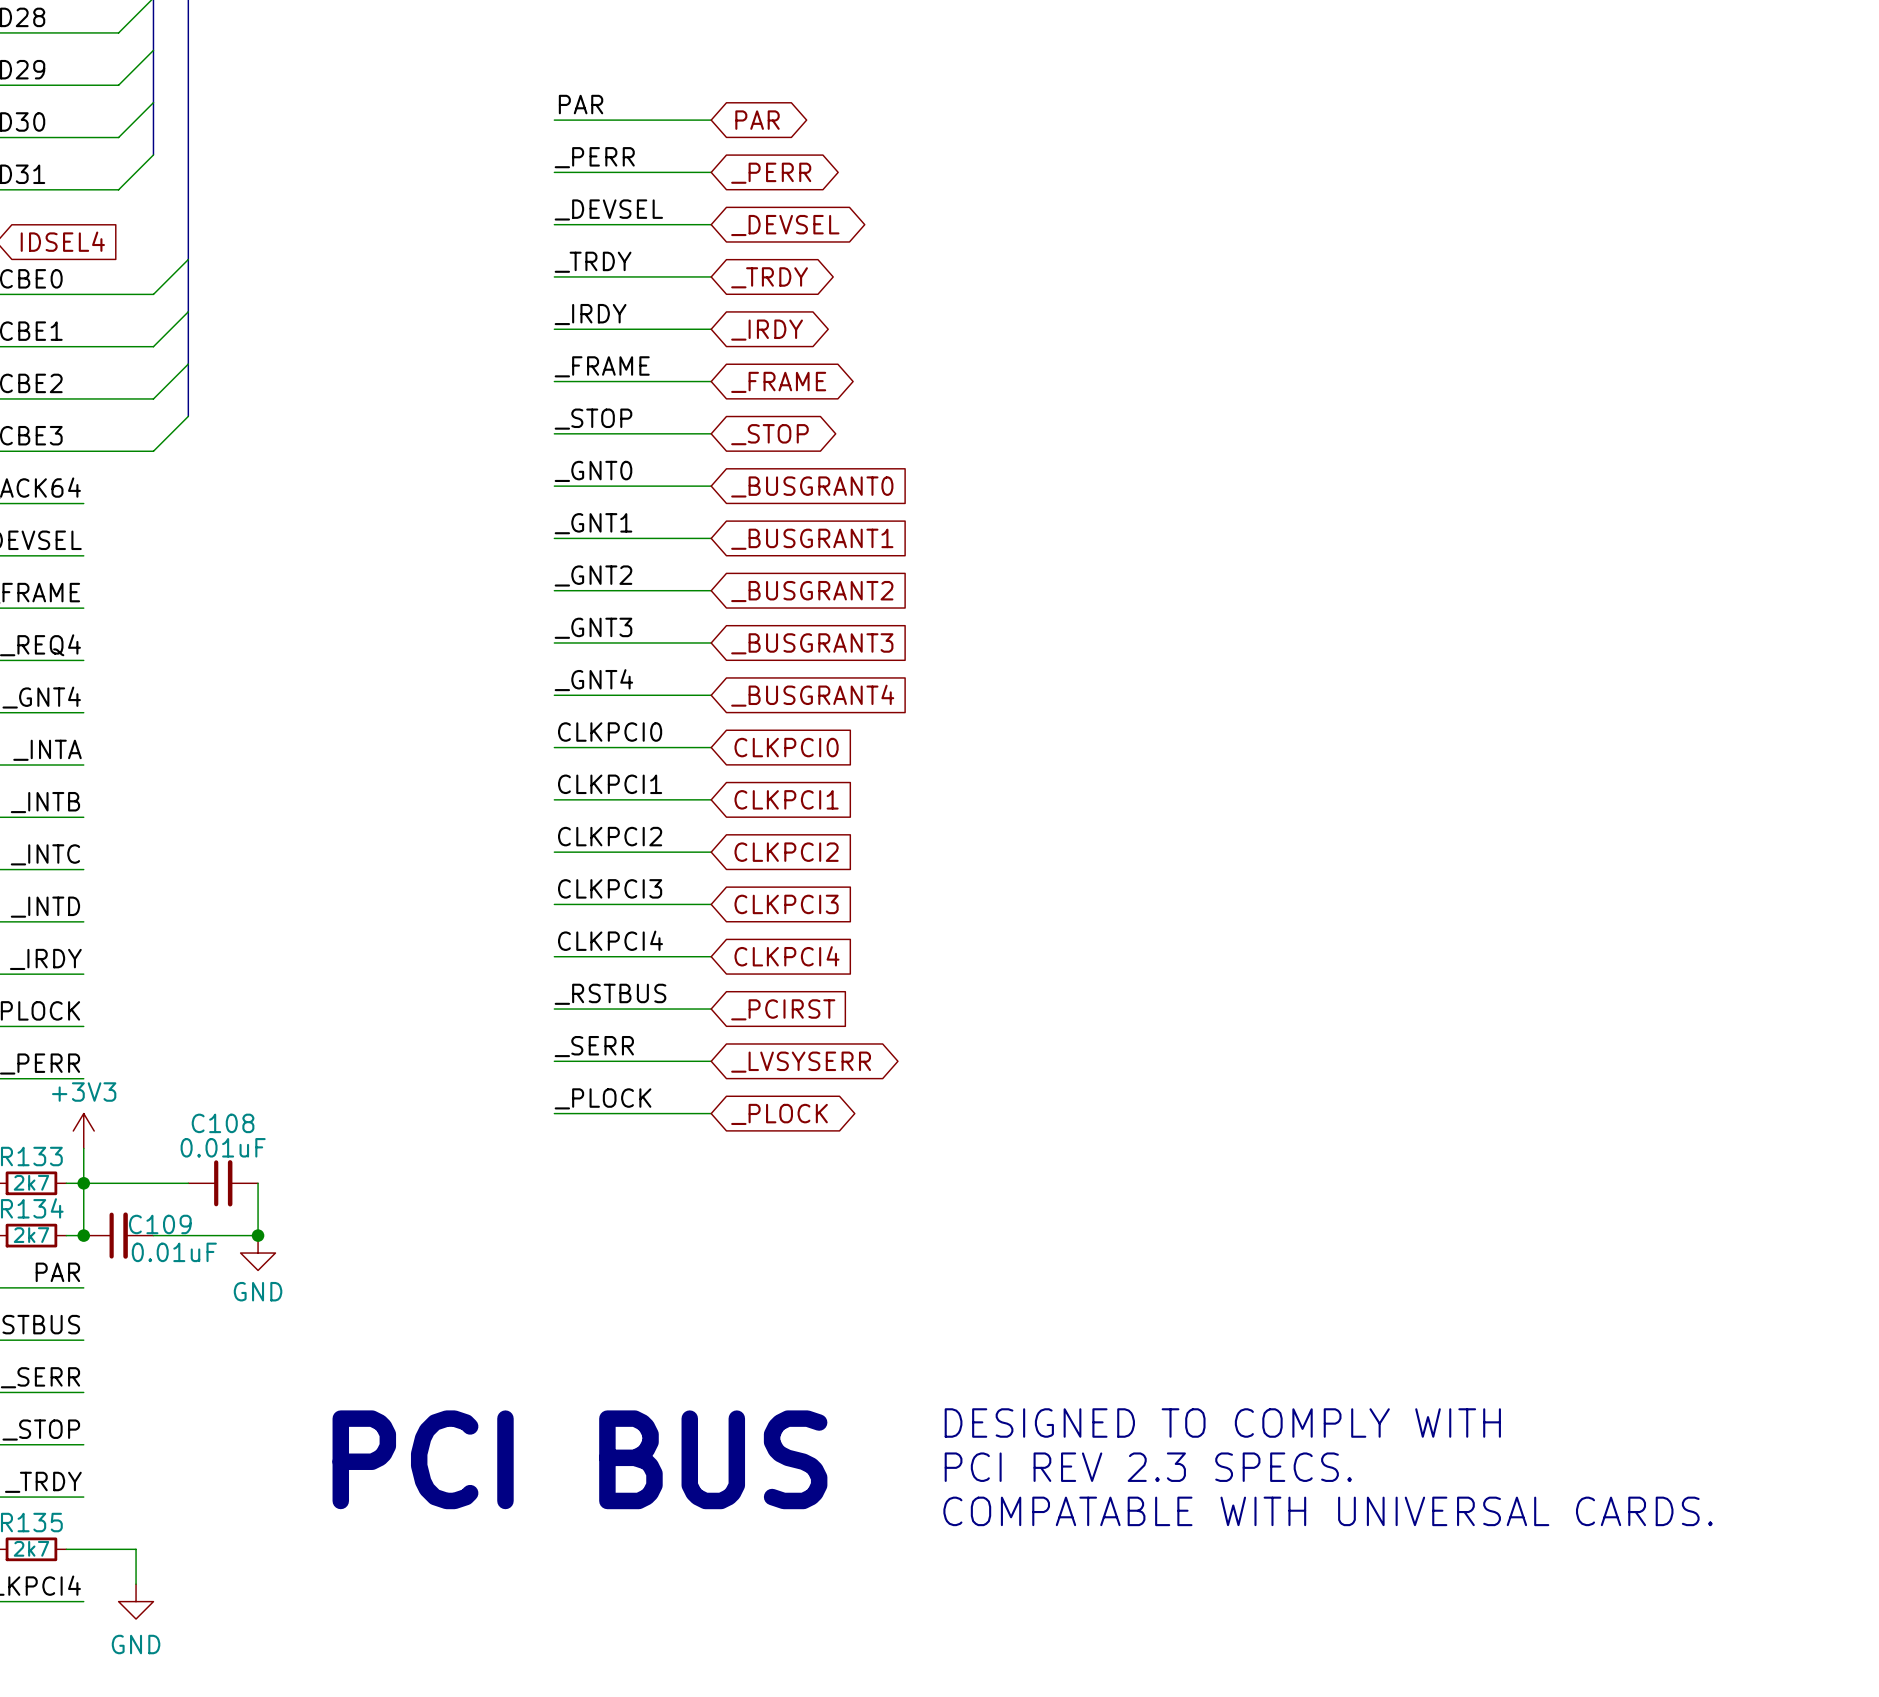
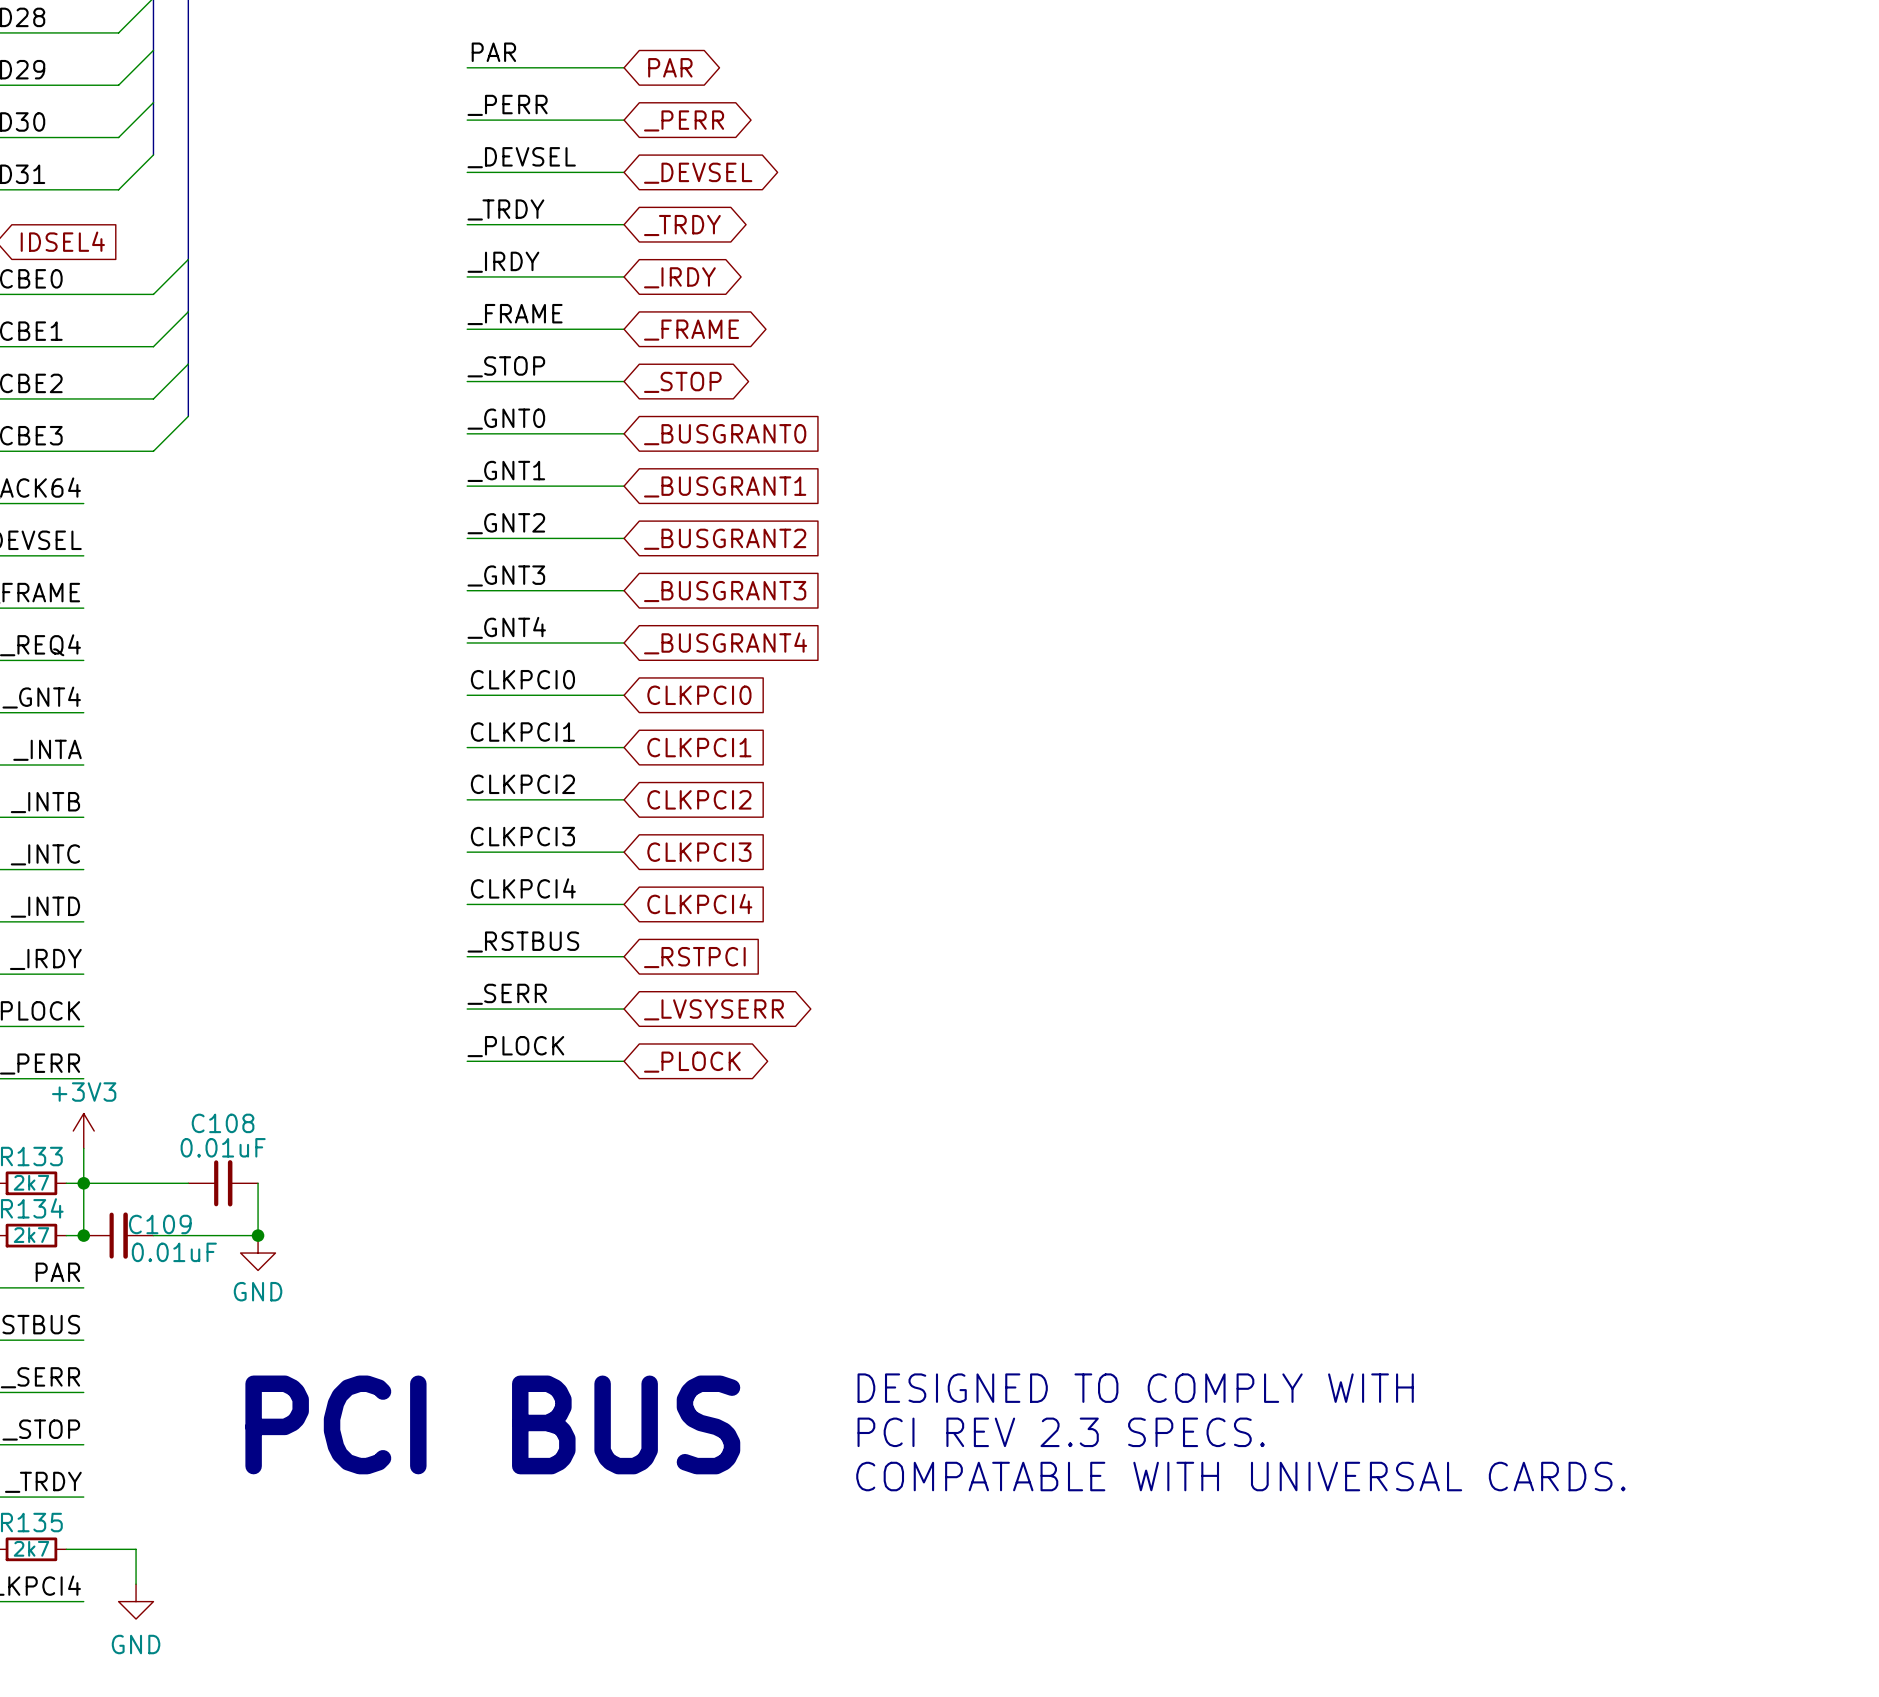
wire: none -> (467, 67) (624, 67)
label position: PAR (581, 104) -> PAR (493, 52)
wire: (624, 120) (711, 120) -> (467, 120) (554, 120)
global label position: PAR (757, 120) -> PAR (670, 67)
label position: _PERR (594, 157) -> _PERR (507, 105)
wire: (624, 172) (711, 172) -> (467, 172) (554, 172)
global label position: _PERR (771, 173) -> _PERR (684, 120)
label position: _DEVSEL (608, 209) -> _DEVSEL (521, 157)
wire: (624, 224) (711, 224) -> (467, 224) (554, 224)
global label position: _DEVSEL (785, 225) -> _DEVSEL (698, 173)
label position: _TRDY (593, 262) -> _TRDY (505, 209)
wire: (624, 276) (711, 276) -> (467, 276) (554, 276)
global label position: _TRDY (769, 277) -> _TRDY (682, 225)
label position: _IRDY (590, 314) -> _IRDY (503, 262)
wire: (624, 329) (711, 329) -> (467, 329) (554, 329)
global label position: _IRDY (767, 330) -> _IRDY (679, 277)
label position: _FRAME (602, 366) -> _FRAME (515, 314)
wire: (624, 381) (711, 381) -> (467, 381) (554, 381)
global label position: _FRAME (778, 382) -> _FRAME (691, 330)
label position: _STOP (593, 419) -> _STOP (506, 366)
wire: (624, 433) (711, 433) -> (467, 433) (554, 433)
global label position: _STOP (769, 434) -> _STOP (682, 382)
label position: _GNT0 (593, 471) -> _GNT0 (506, 419)
wire: (624, 486) (711, 486) -> (467, 486) (554, 486)
global label position: _BUSGRANT0 (812, 486) -> _BUSGRANT0 (725, 434)
label position: _GNT1 (593, 523) -> _GNT1 (506, 471)
wire: (624, 538) (711, 538) -> (467, 538) (554, 538)
global label position: _BUSGRANT1 (812, 539) -> _BUSGRANT1 (725, 486)
label position: _GNT2 (593, 575) -> _GNT2 (506, 523)
wire: (624, 590) (711, 590) -> (467, 590) (554, 590)
global label position: _BUSGRANT2 (812, 591) -> _BUSGRANT2 (725, 539)
label position: _GNT3 (593, 628) -> _GNT3 (506, 575)
wire: (624, 642) (711, 642) -> (467, 642) (554, 642)
global label position: _BUSGRANT3 (812, 643) -> _BUSGRANT3 (725, 591)
label position: _GNT4 (593, 680) -> _GNT4 (506, 627)
wire: (624, 695) (711, 695) -> (467, 695) (554, 695)
global label position: _BUSGRANT4 (812, 695) -> _BUSGRANT4 (725, 643)
label position: CLKPCI0 (610, 732) -> CLKPCI0 (522, 679)
wire: (624, 747) (711, 747) -> (467, 747) (554, 747)
global label position: CLKPCI0 (786, 747) -> CLKPCI0 (699, 695)
label position: CLKPCI1 (610, 784) -> CLKPCI1 (522, 732)
wire: (624, 799) (711, 799) -> (467, 799) (554, 799)
global label position: CLKPCI1 (786, 799) -> CLKPCI1 (699, 747)
label position: CLKPCI2 (610, 836) -> CLKPCI2 (522, 784)
wire: (624, 852) (711, 852) -> (467, 852) (554, 852)
global label position: CLKPCI2 (786, 852) -> CLKPCI2 (699, 799)
label position: CLKPCI3 (610, 888) -> CLKPCI3 (522, 836)
wire: (624, 904) (711, 904) -> (467, 904) (554, 904)
global label position: CLKPCI3 (786, 904) -> CLKPCI3 (699, 852)
label position: CLKPCI4 (610, 940) -> CLKPCI4 (523, 888)
wire: (624, 956) (711, 956) -> (467, 956) (554, 956)
global label position: CLKPCI4 (786, 956) -> CLKPCI4 (699, 904)
global label: none -> _RSTPCI (694, 957)
label position: _RSTBUS (610, 994) -> _RSTBUS (523, 942)
wire: (624, 1009) (711, 1009) -> (467, 1009) (554, 1009)
global label: _PCIRST (783, 1009) -> none
label position: _SERR (594, 1046) -> _SERR (507, 994)
wire: (624, 1061) (711, 1061) -> (467, 1061) (554, 1061)
global label position: _LVSYSERR (801, 1062) -> _LVSYSERR (713, 1009)
label position: _PLOCK (603, 1098) -> _PLOCK (515, 1046)
wire: (554, 1113) (711, 1113) -> none
global label position: _PLOCK (779, 1114) -> _PLOCK (692, 1062)
text position: DESIGNED TO COMPLY WITH (1222, 1423) -> DESIGNED TO COMPLY WITH (1135, 1388)
text position: PCI BUS (579, 1459) -> PCI BUS (492, 1424)
text position: PCI REV 2.3 SPECS. (1148, 1467) -> PCI REV 2.3 SPECS. (1061, 1432)
text position: COMPATABLE WITH UNIVERSAL CARDS. (1328, 1511) -> COMPATABLE WITH UNIVERSAL CARDS. (1240, 1476)

